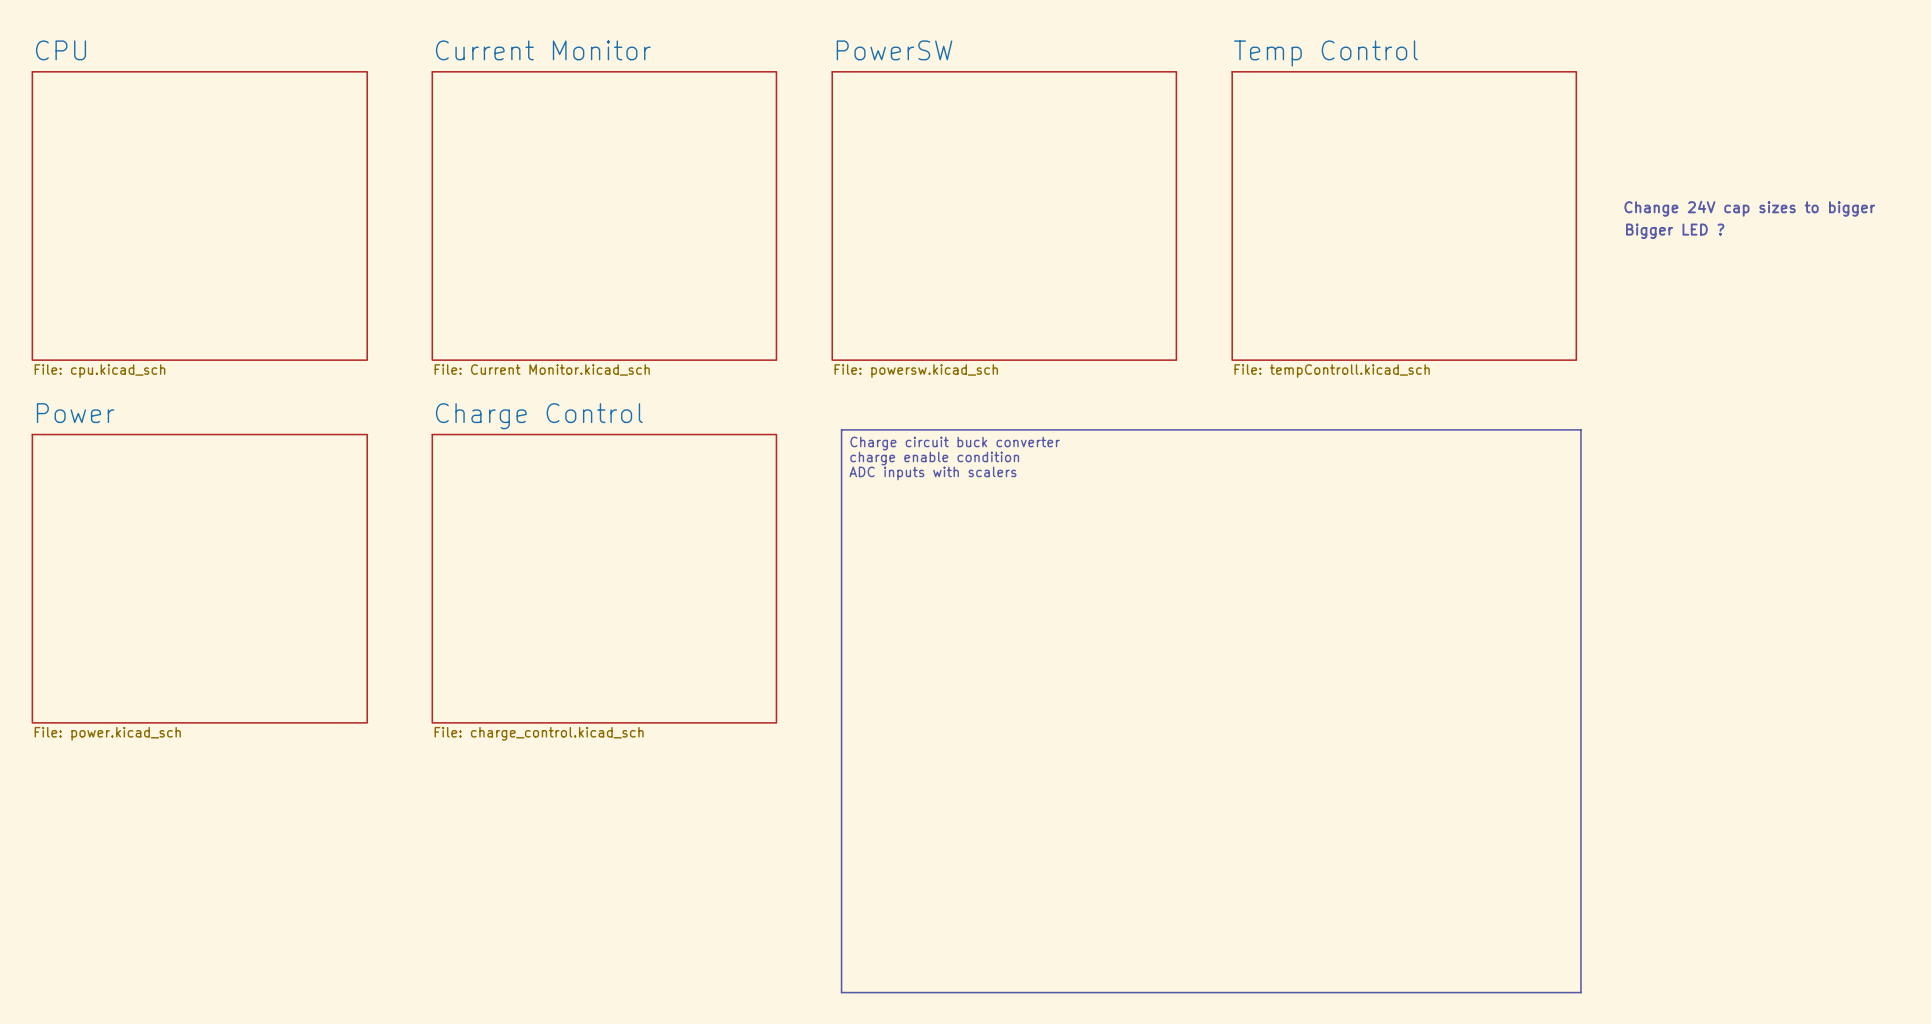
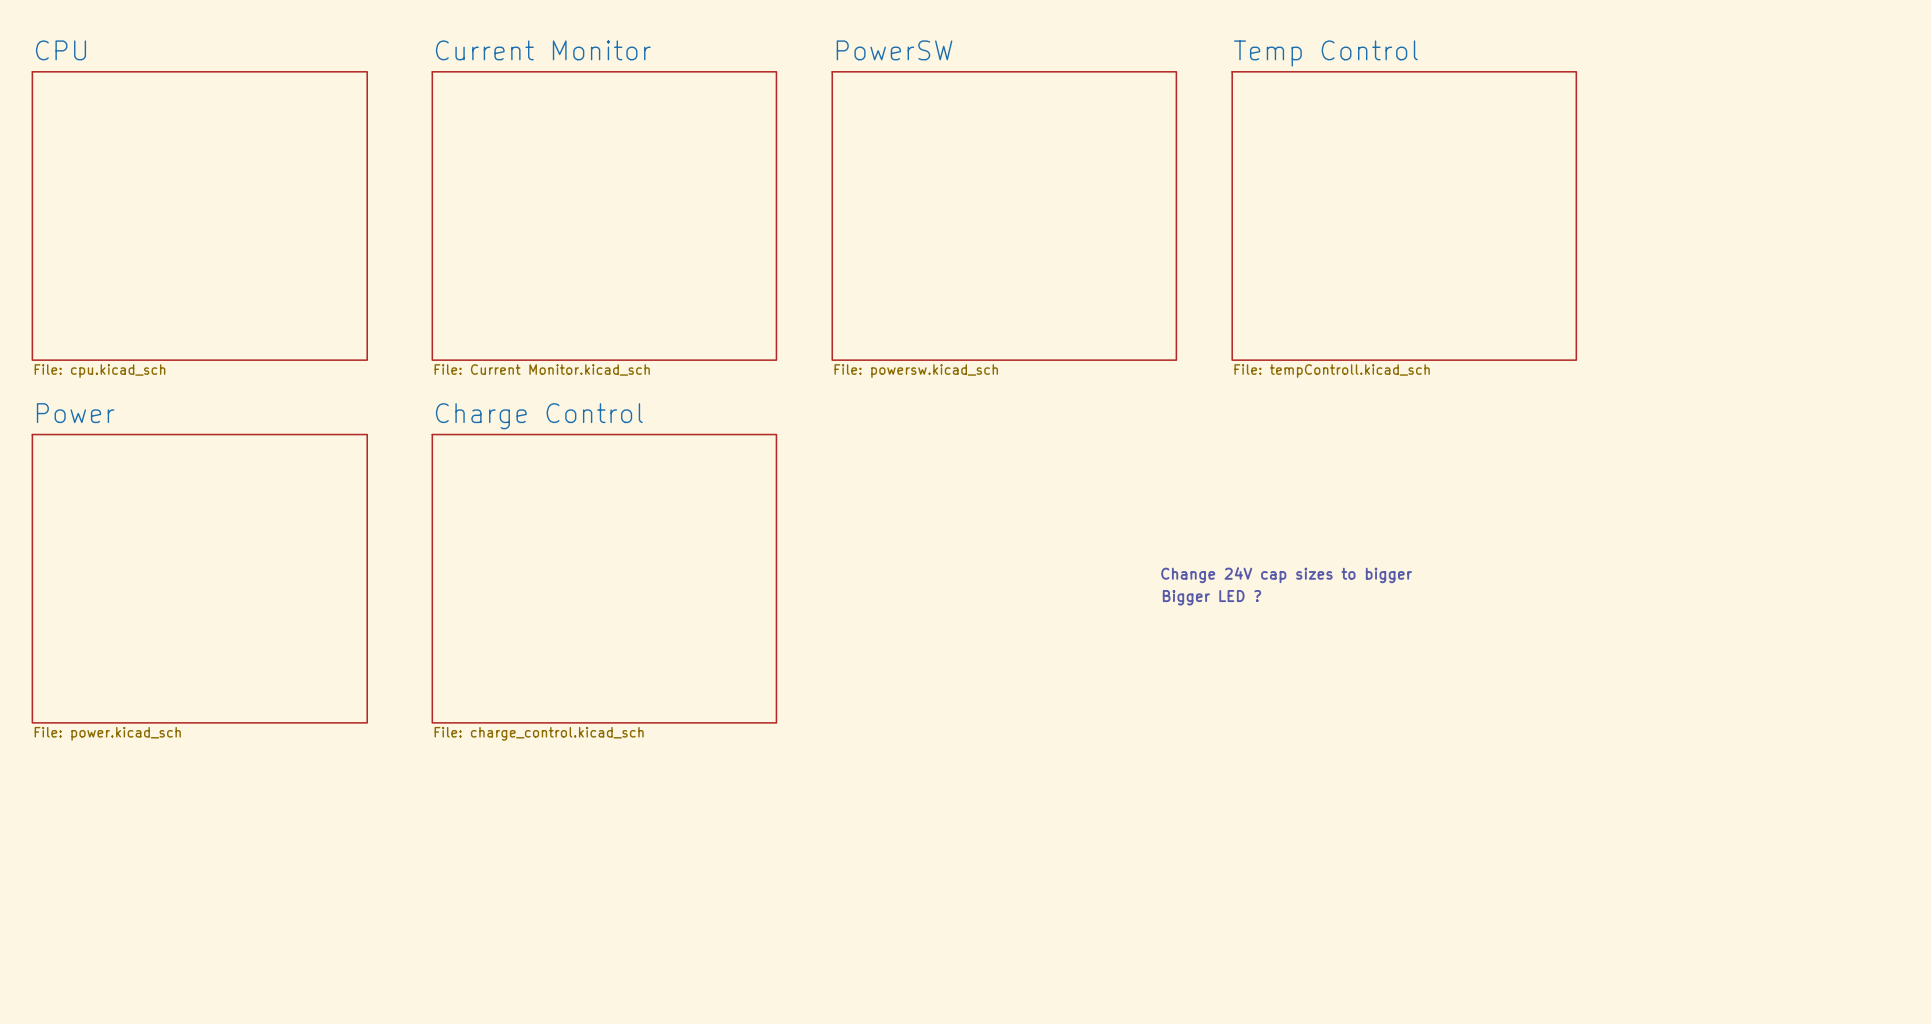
text: Change 24V cap sizes to bigger (1749, 208) -> none
text: Bigger LED ? (1675, 231) -> none
line: (841, 429) (1580, 429) (1580, 992) (841, 992) (841, 429) -> none
text: Charge circuit buck converter (955, 443) -> none
text: charge enable condition (934, 458) -> none
text: ADC inputs with scalers (932, 473) -> none
text: none -> Change 24V cap sizes to bigger (1286, 575)
text: none -> Bigger LED ? (1211, 597)

